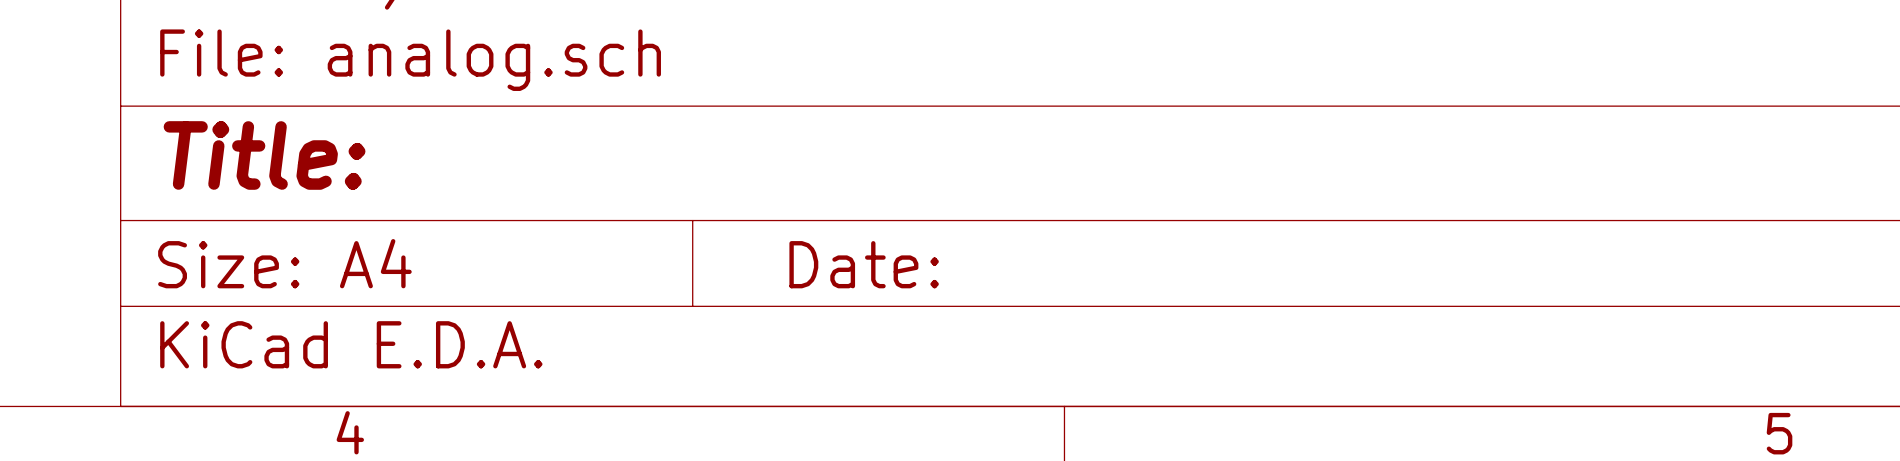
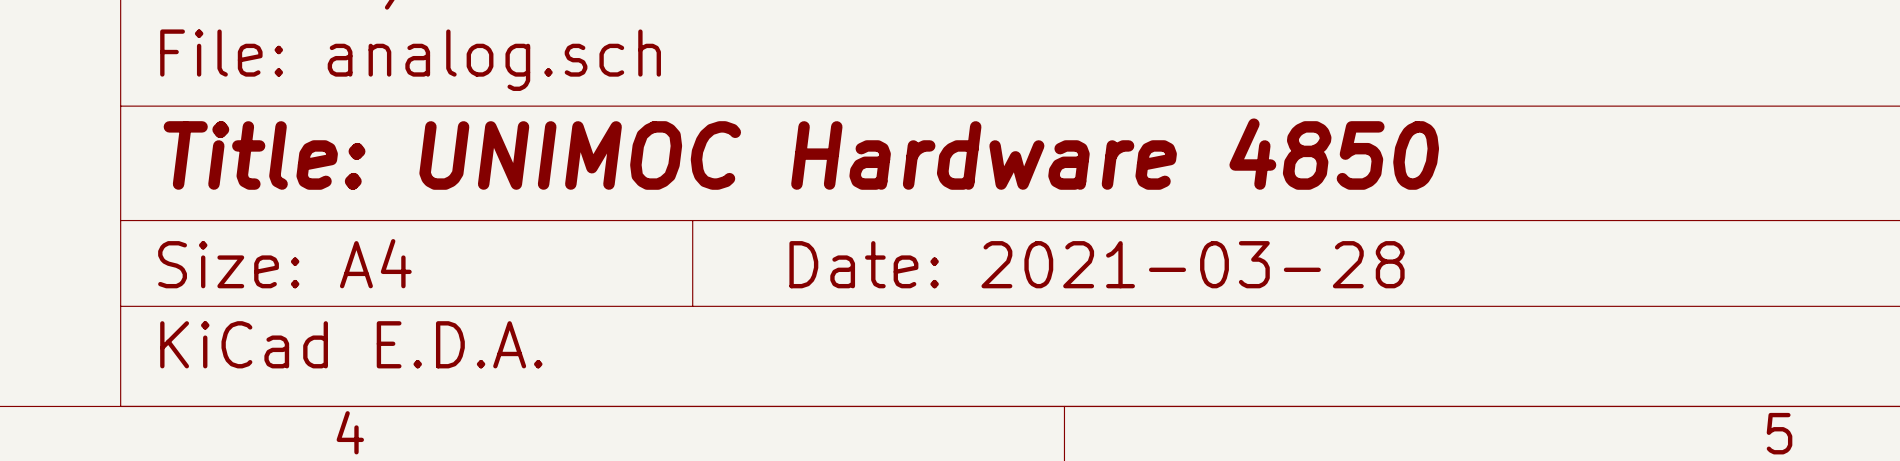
title block: Title: (264, 155) -> Title: UNIMOC Hardware 4850 (801, 154)
title block: Date: (864, 264) -> Date: 2021-03-28 (1097, 264)

